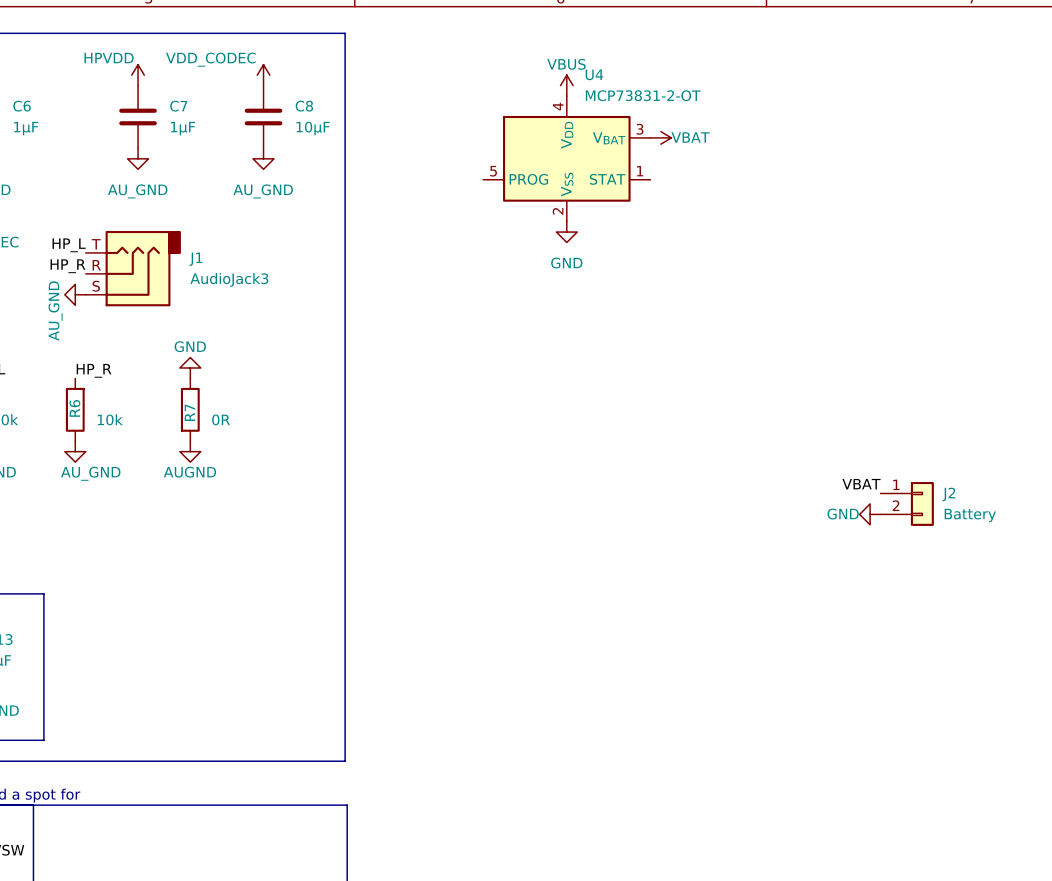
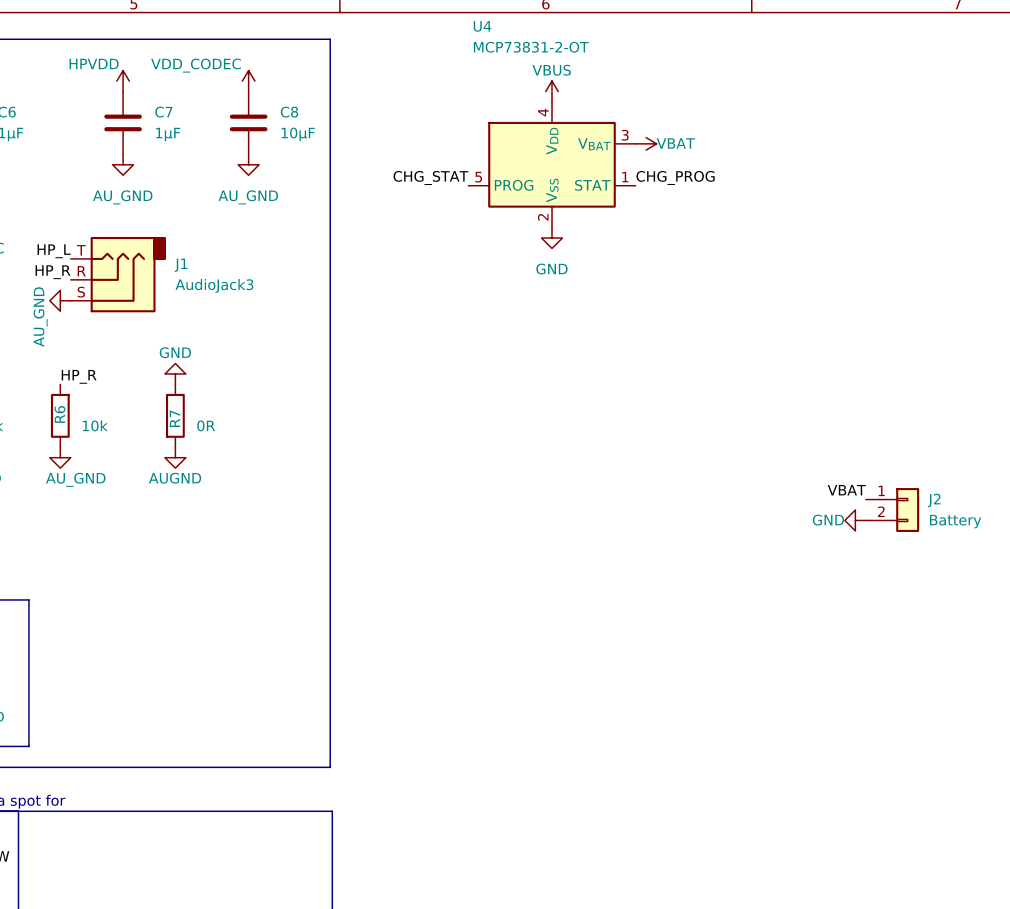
U4 name position: U4 (594, 74) -> U4 (482, 26)
U4 value position: MCP73831-2-OT (643, 95) -> MCP73831-2-OT (531, 47)
label: none -> CHG_STAT (430, 177)
label: none -> CHG_PROG (675, 177)

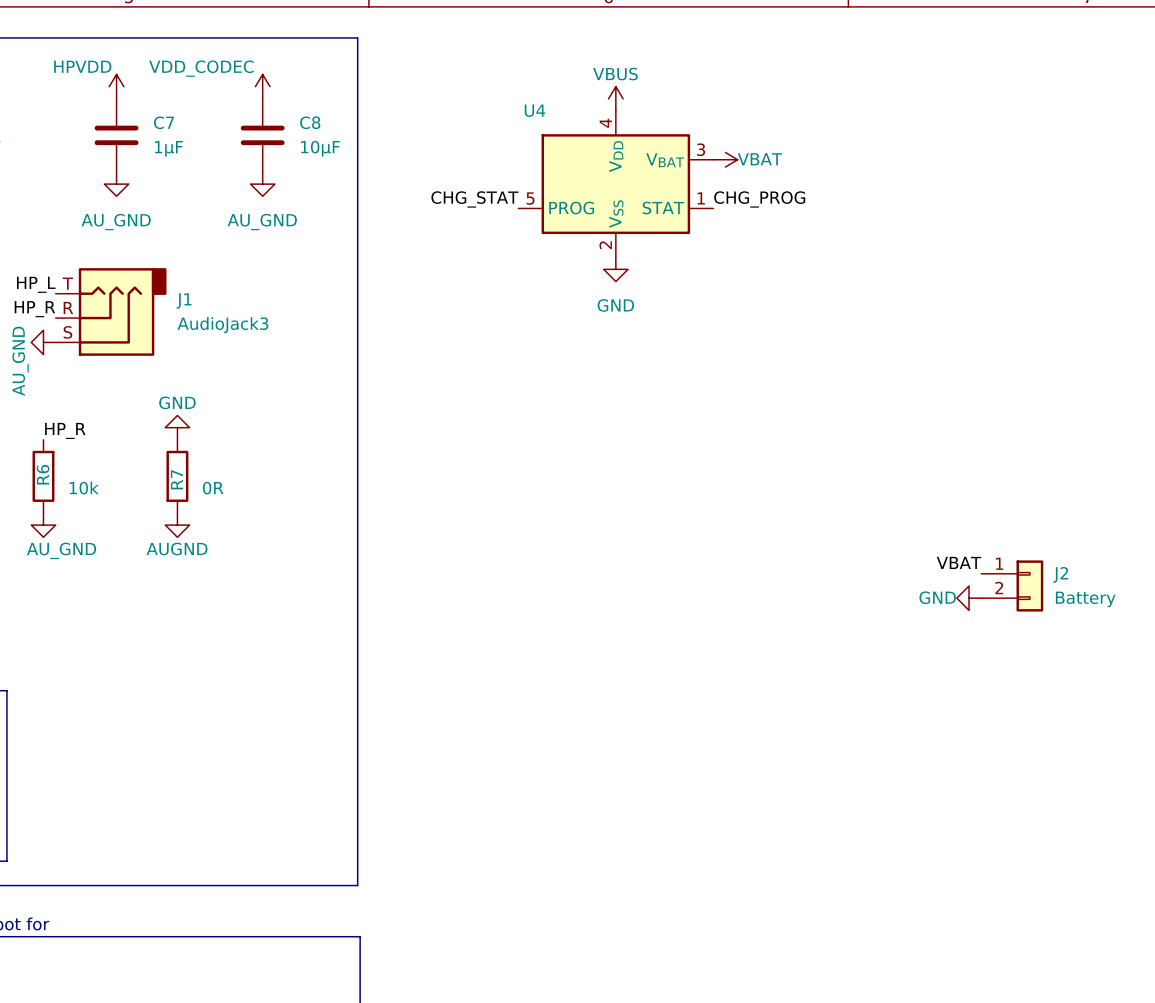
U4 name position: U4 (482, 26) -> U4 (534, 110)
U4 value: MCP73831-2-OT (531, 47) -> none

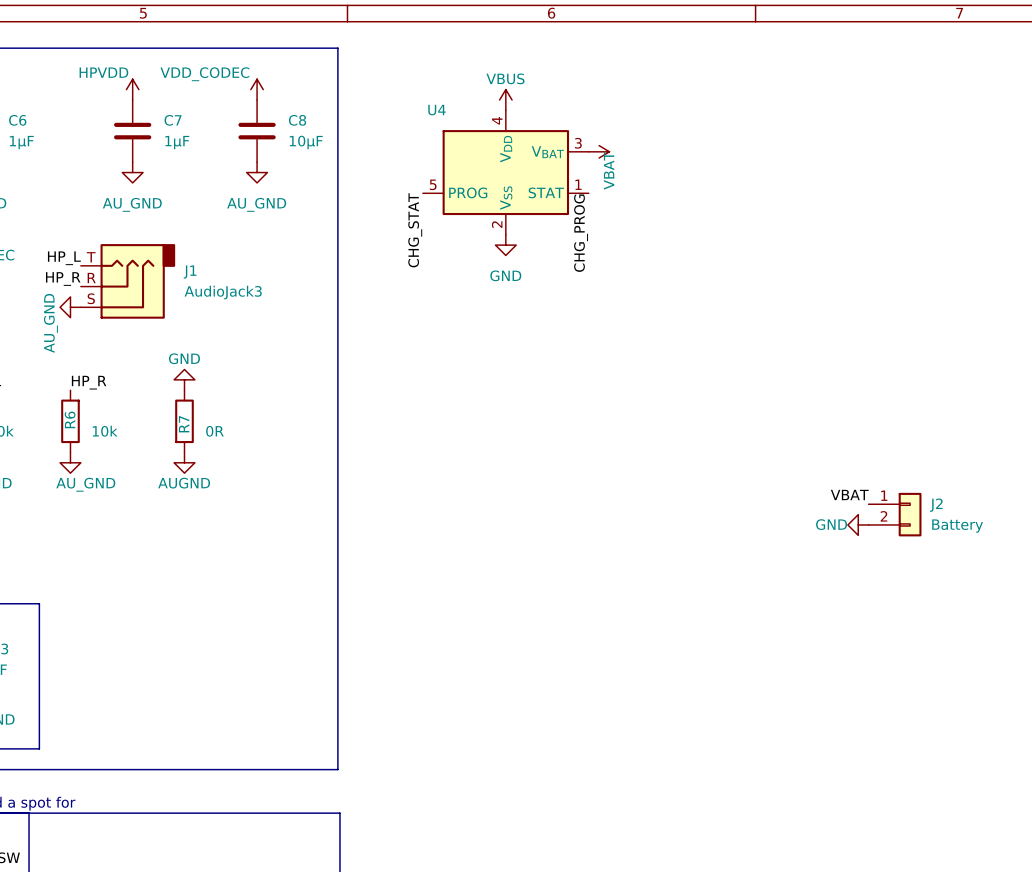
power symbol position: VBUS (615, 98) -> VBUS (505, 100)
power symbol position: VBAT (725, 159) -> VBAT (599, 151)
power symbol text rotation: 0° (759, 159) -> 90° counterclockwise (609, 170)
U4 position: (615, 184) -> (505, 172)
label rotation: 0° (474, 199) -> 90° counterclockwise (415, 230)
label rotation: 0° (759, 199) -> 90° counterclockwise (581, 233)
label position: CHG_PROG (759, 199) -> CHG_PROG (581, 233)
power symbol position: GND (615, 269) -> GND (505, 245)

